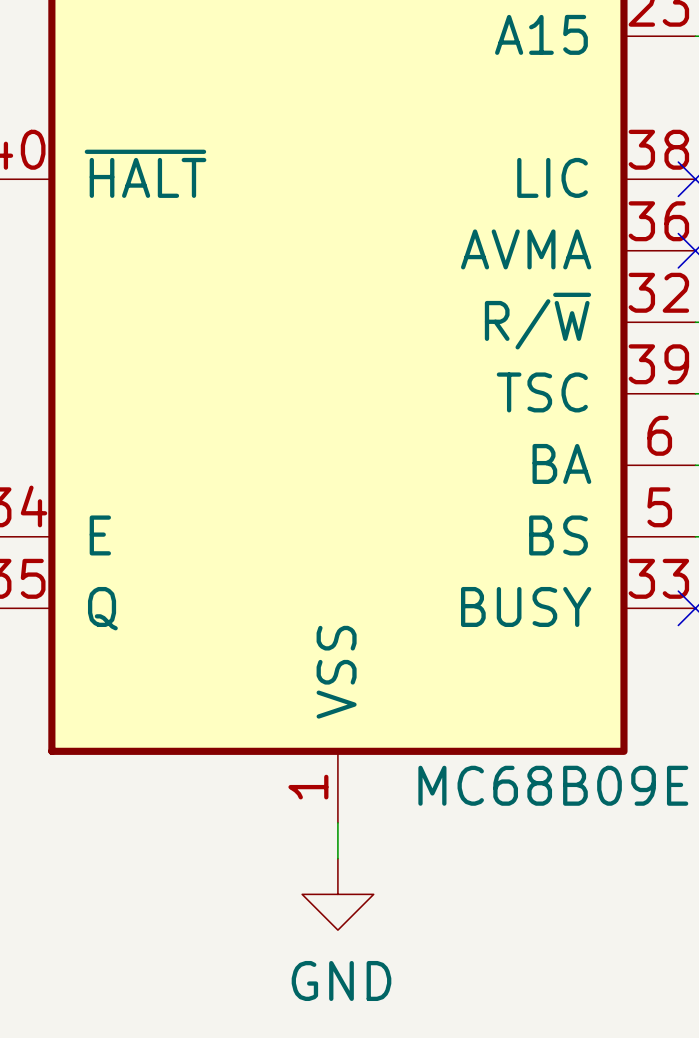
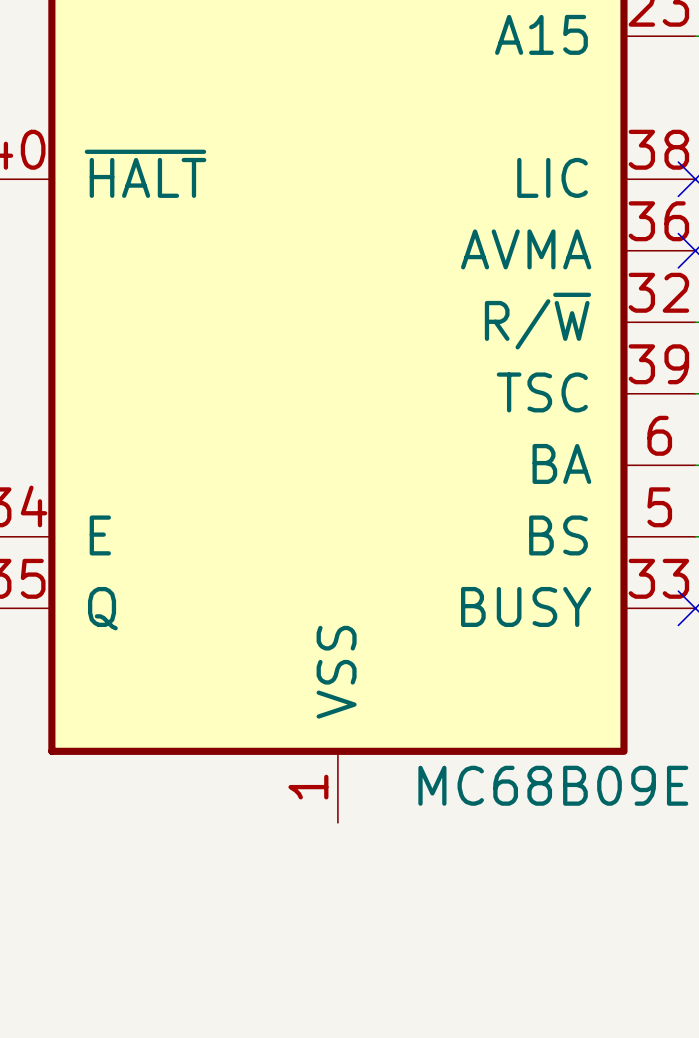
wire: (337, 822) (337, 858) -> none
power symbol: GND (337, 894) -> none

